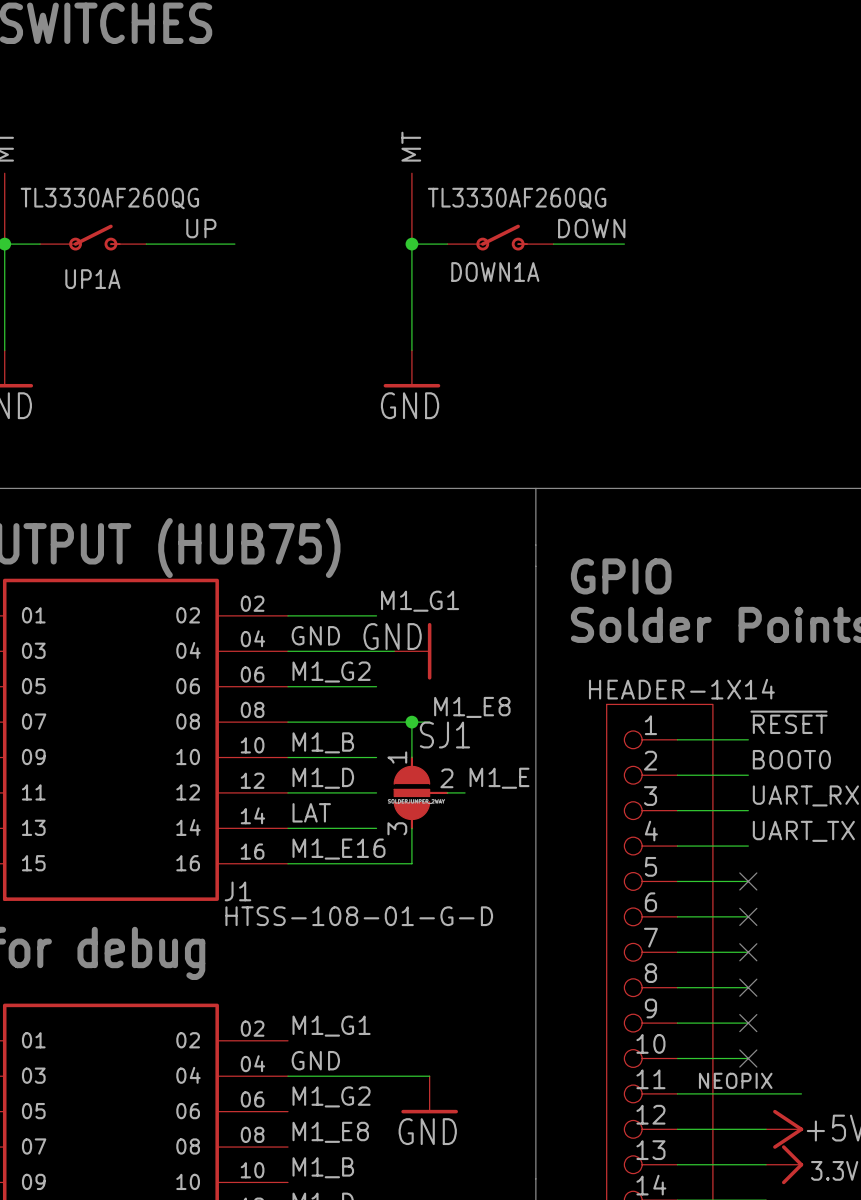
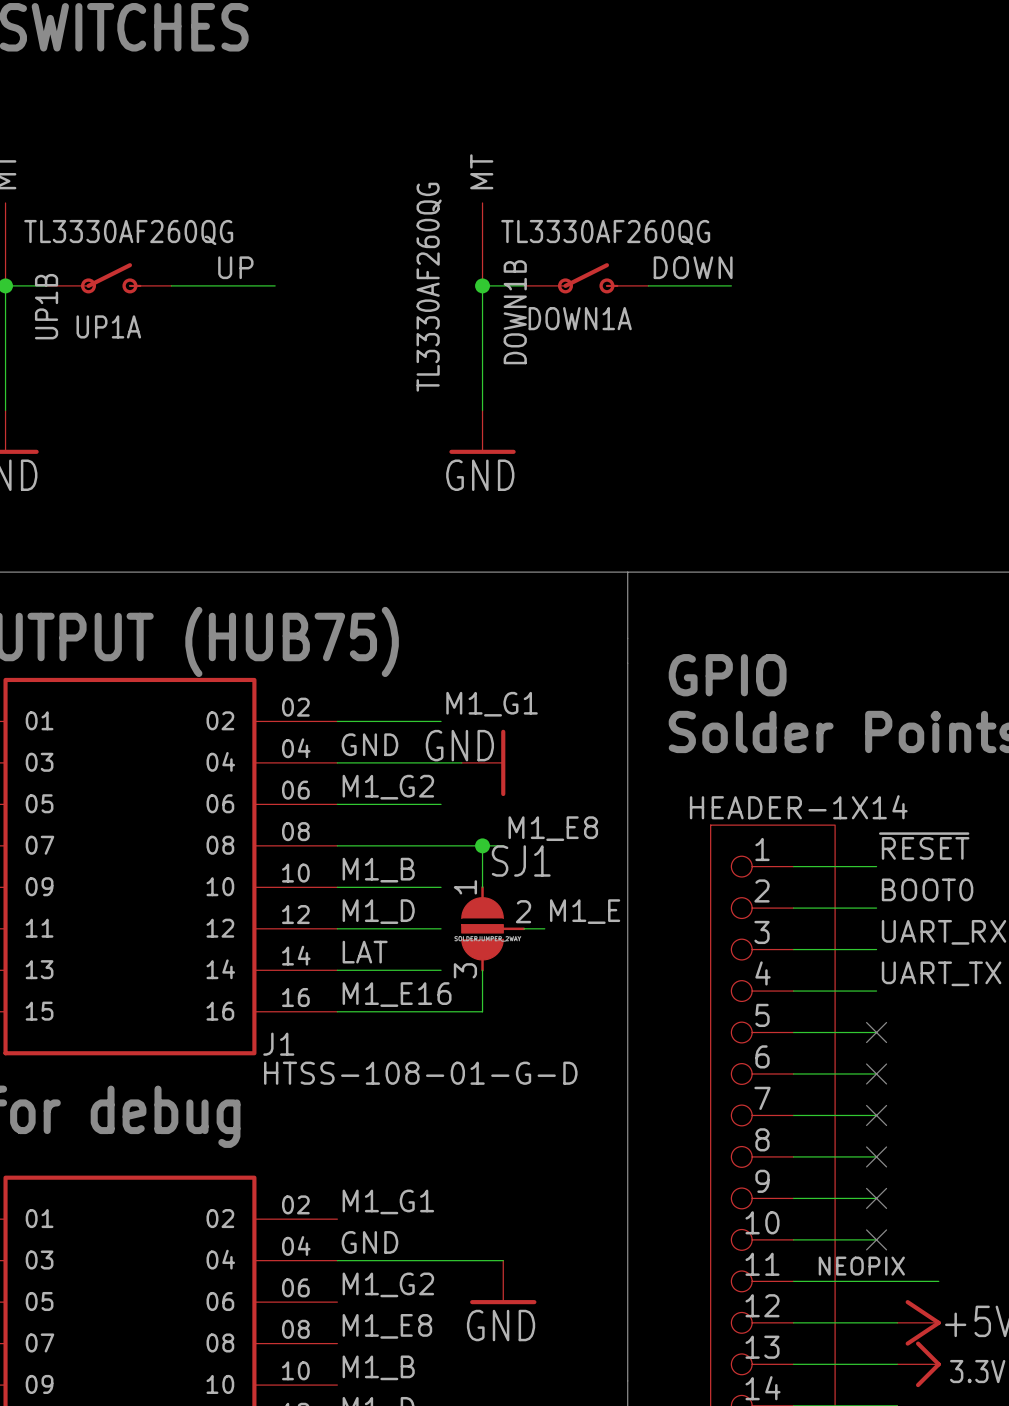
DOWN1B value: none -> TL3330AF260QG (429, 287)
UP1B name: none -> UP1B (46, 306)
DOWN1B name: none -> DOWN1B (515, 312)

